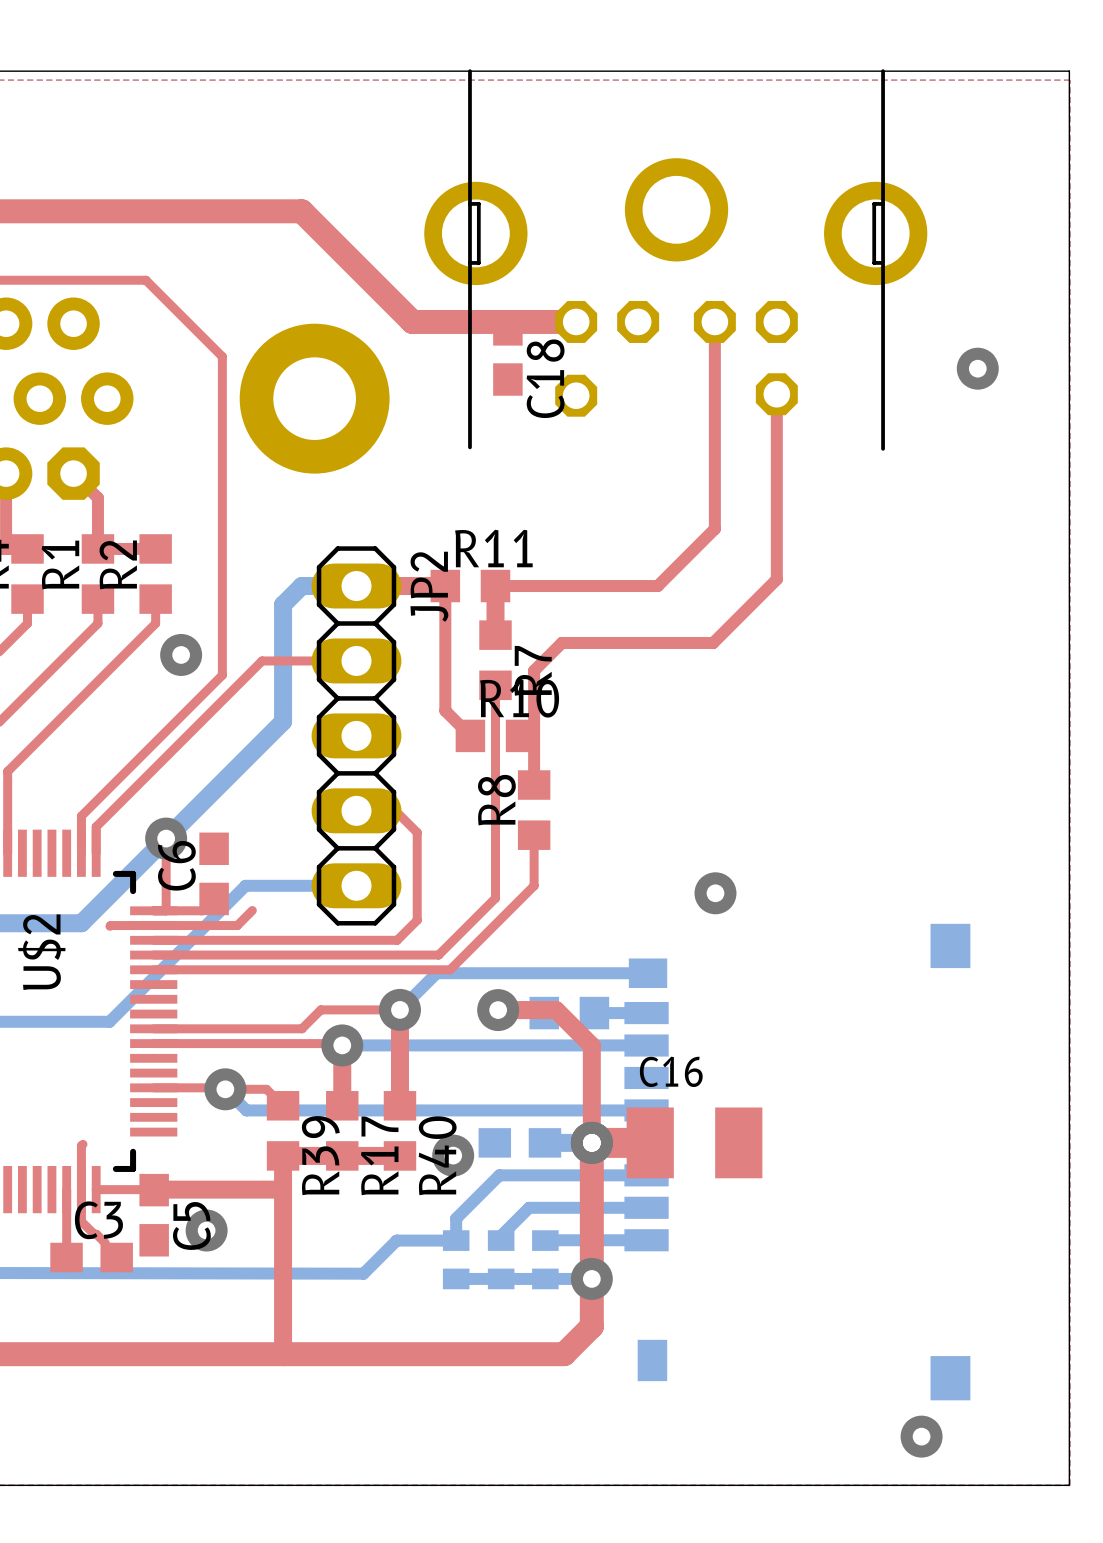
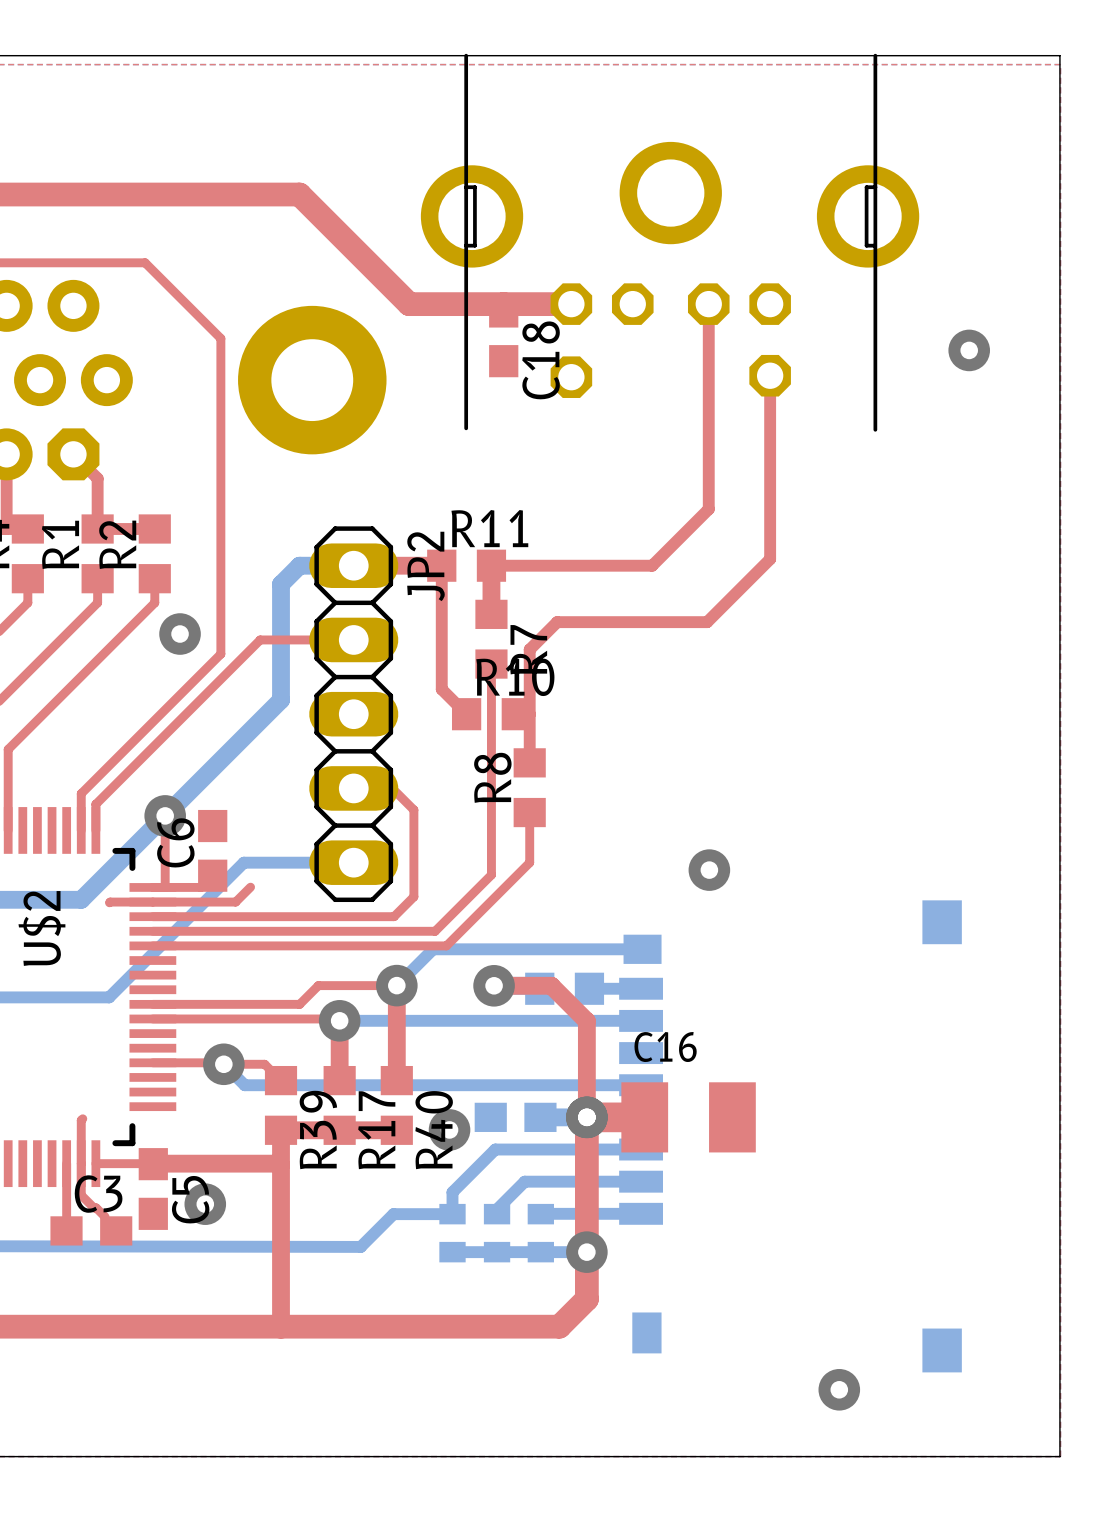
via position: (921, 1436) -> (839, 1389)

